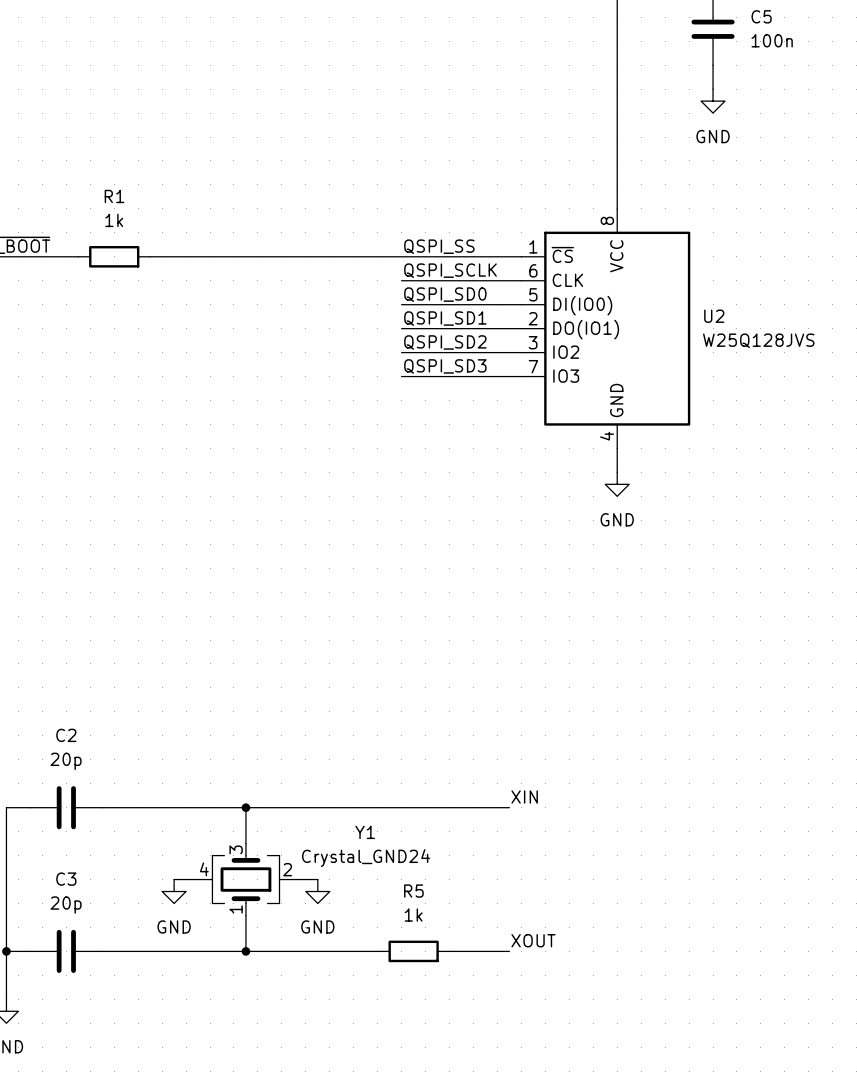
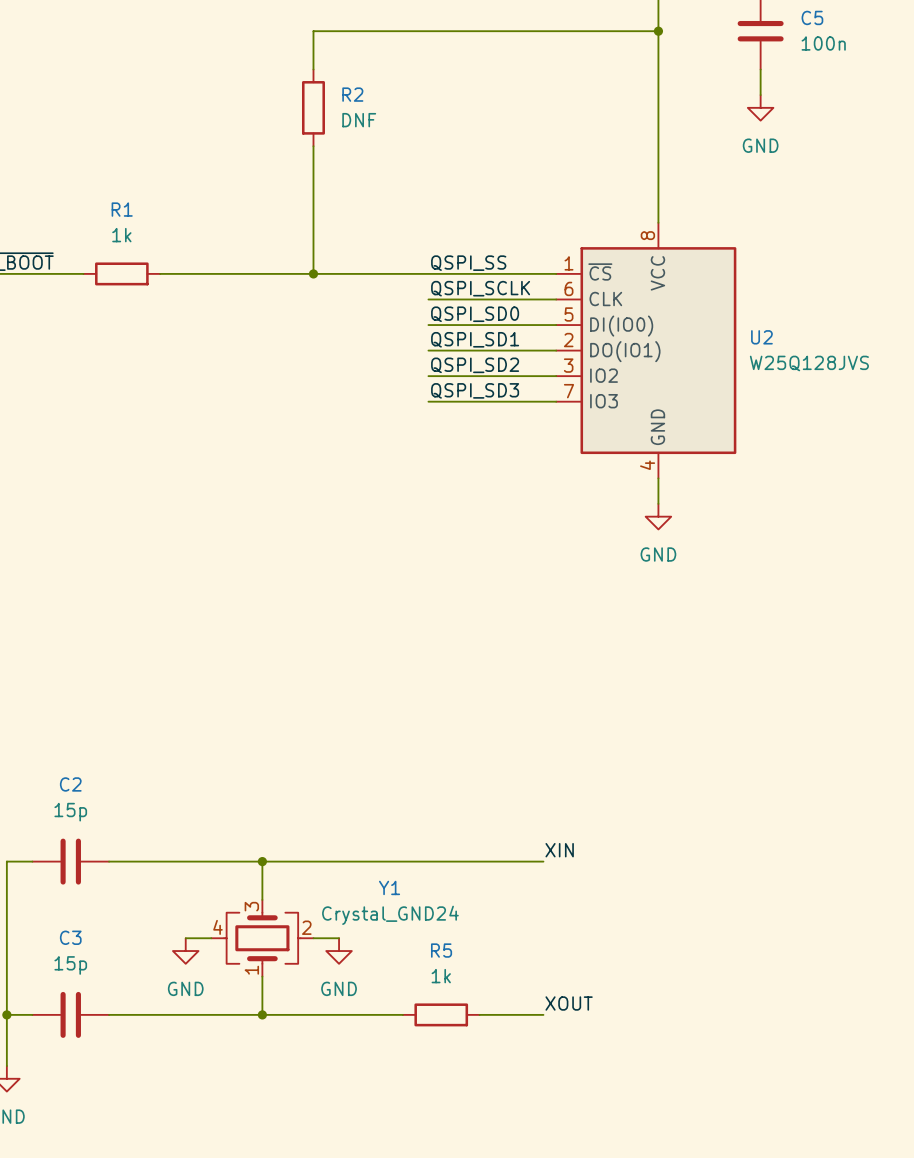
wire: none -> (658, 31) (313, 31) (313, 69)
junction: none -> (658, 31)
R2: none -> DNF (313, 107)
wire: none -> (313, 146) (313, 273)
junction: none -> (313, 273)
C2 value: 20p (66, 761) -> 15p (70, 812)
C3 value: 20p (66, 905) -> 15p (70, 965)

